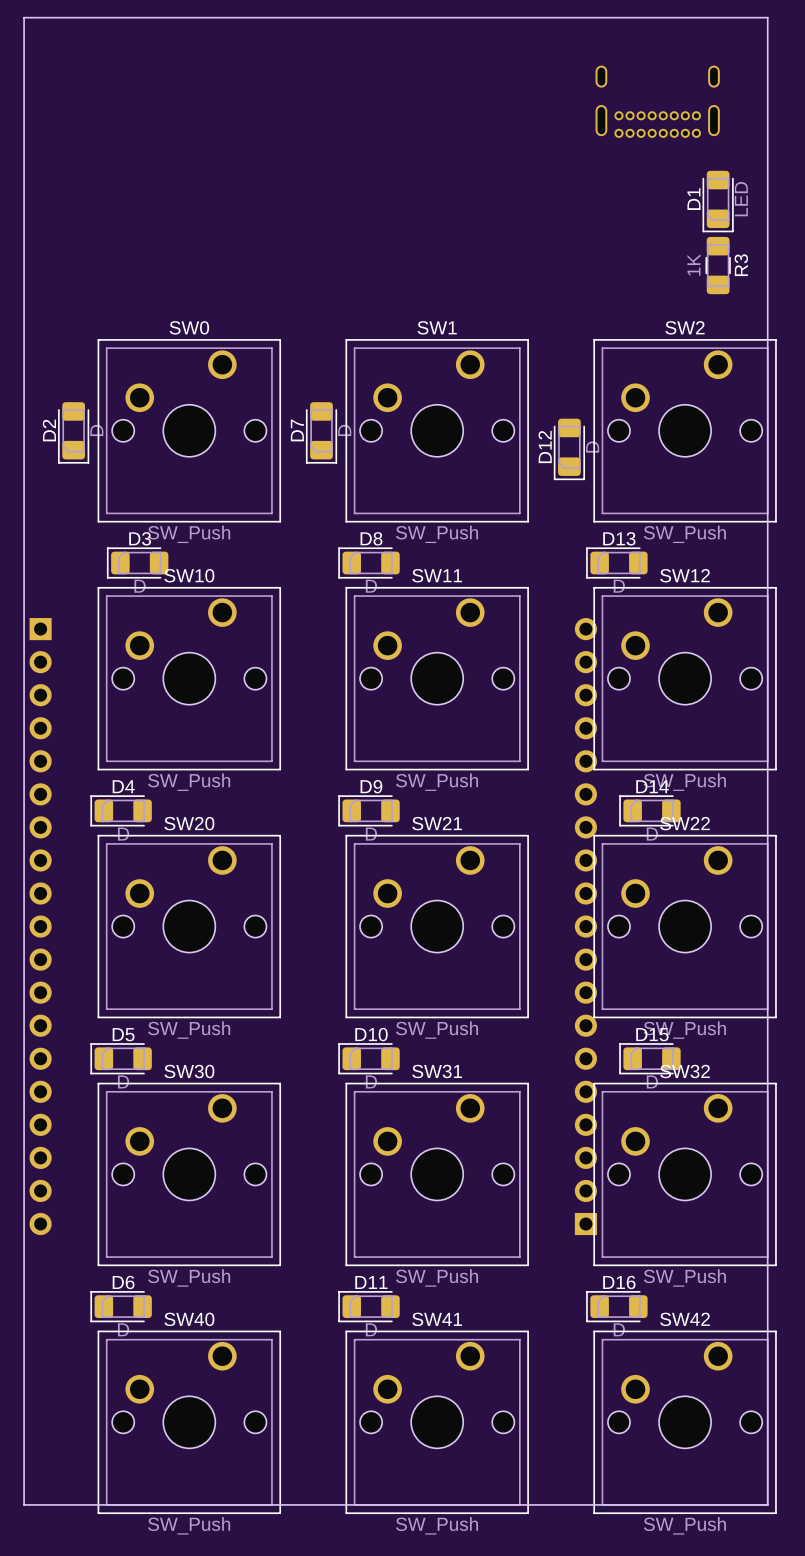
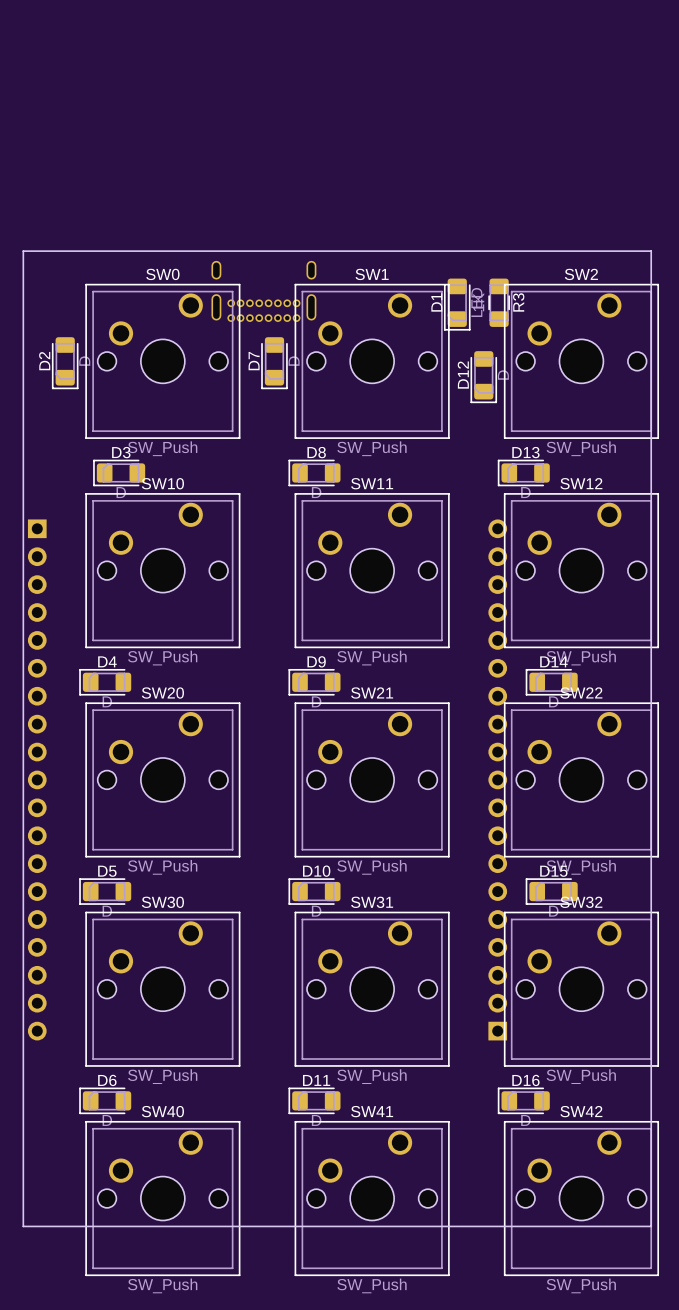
part: (657, 101) -> none
D1 position: (718, 201) -> (457, 304)
R3 position: (718, 265) -> (499, 302)
board edge: (24, 300) (24, 17) (767, 17) (767, 300) -> (23, 251) (651, 251)
part: none -> (263, 291)
board edge: (24, 1455) (24, 1504) (767, 1504) (767, 1455) -> (23, 1226) (651, 1226)

